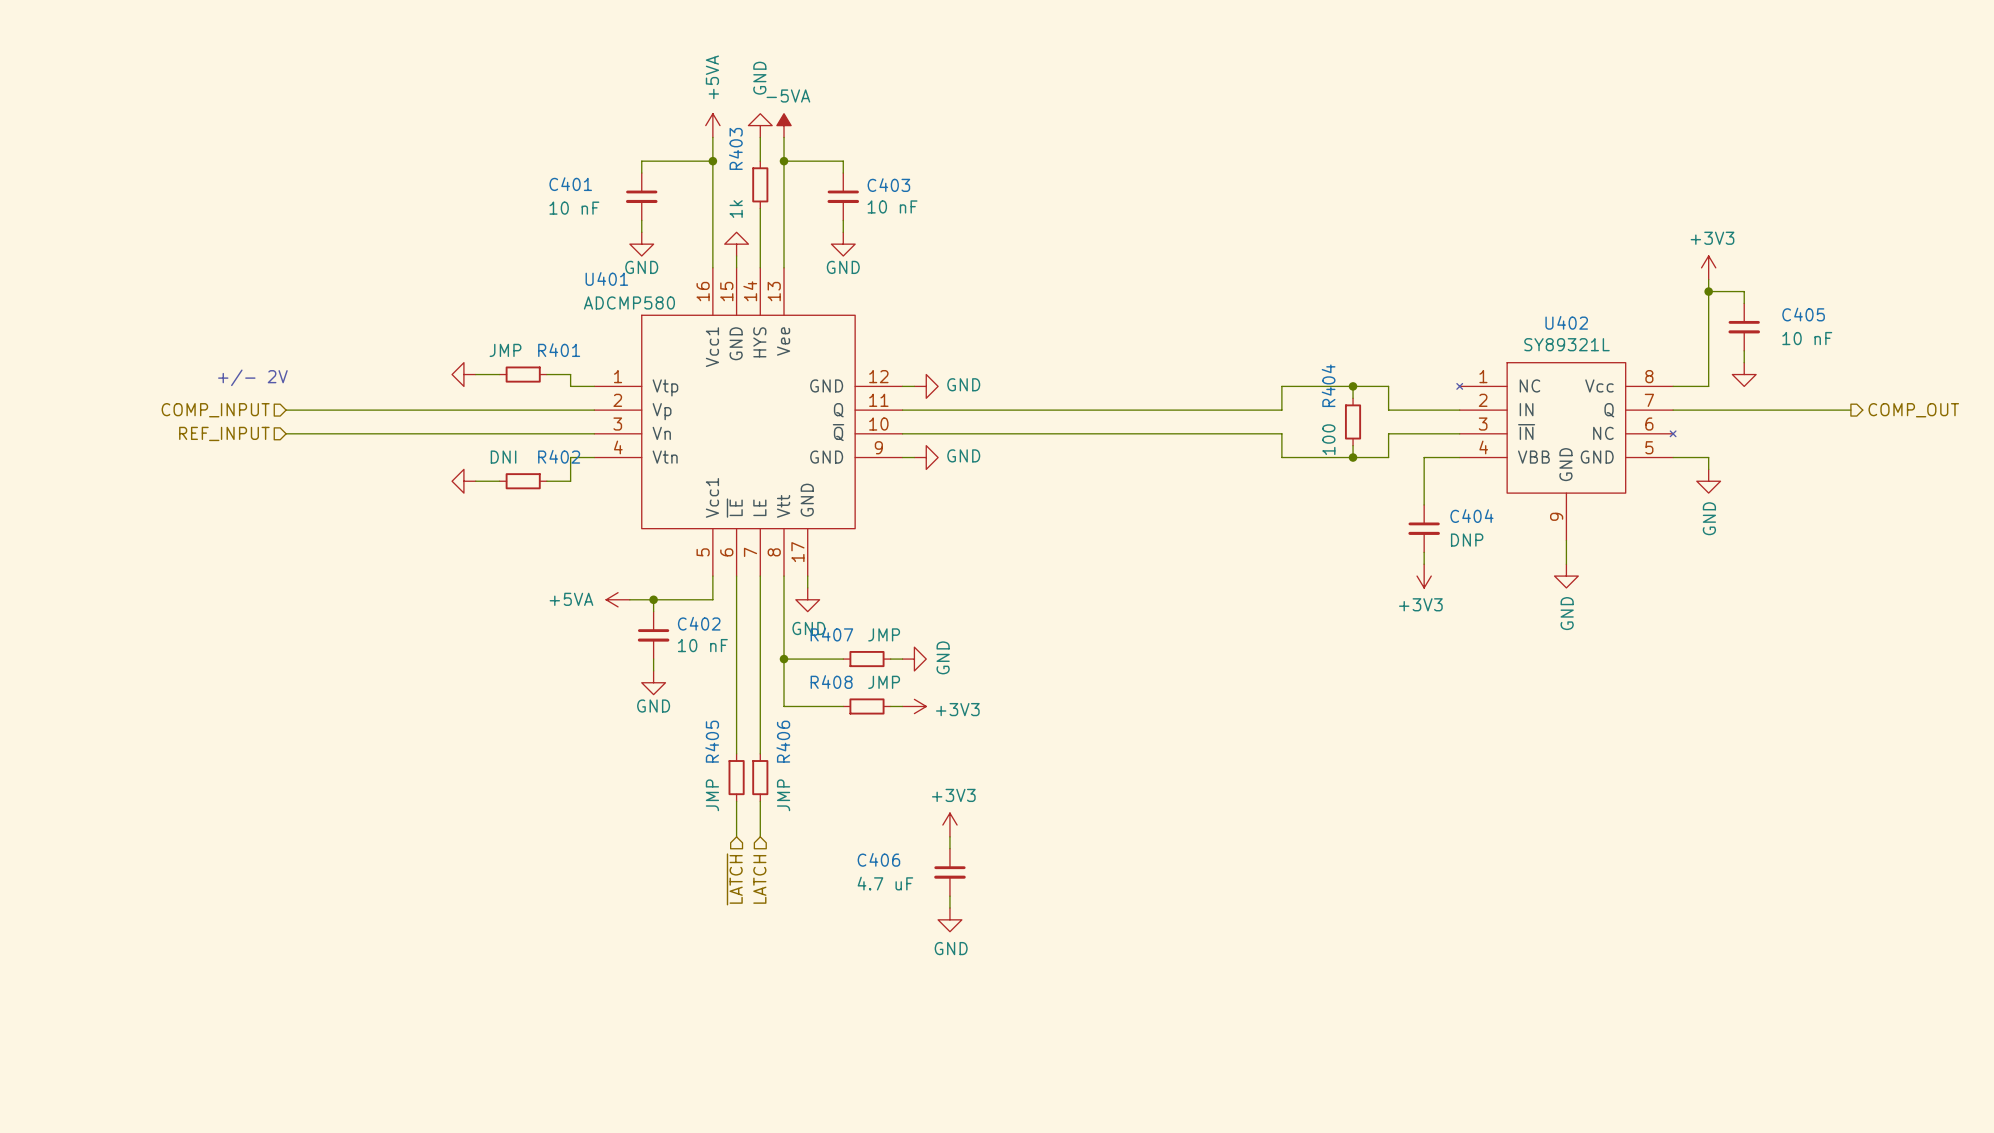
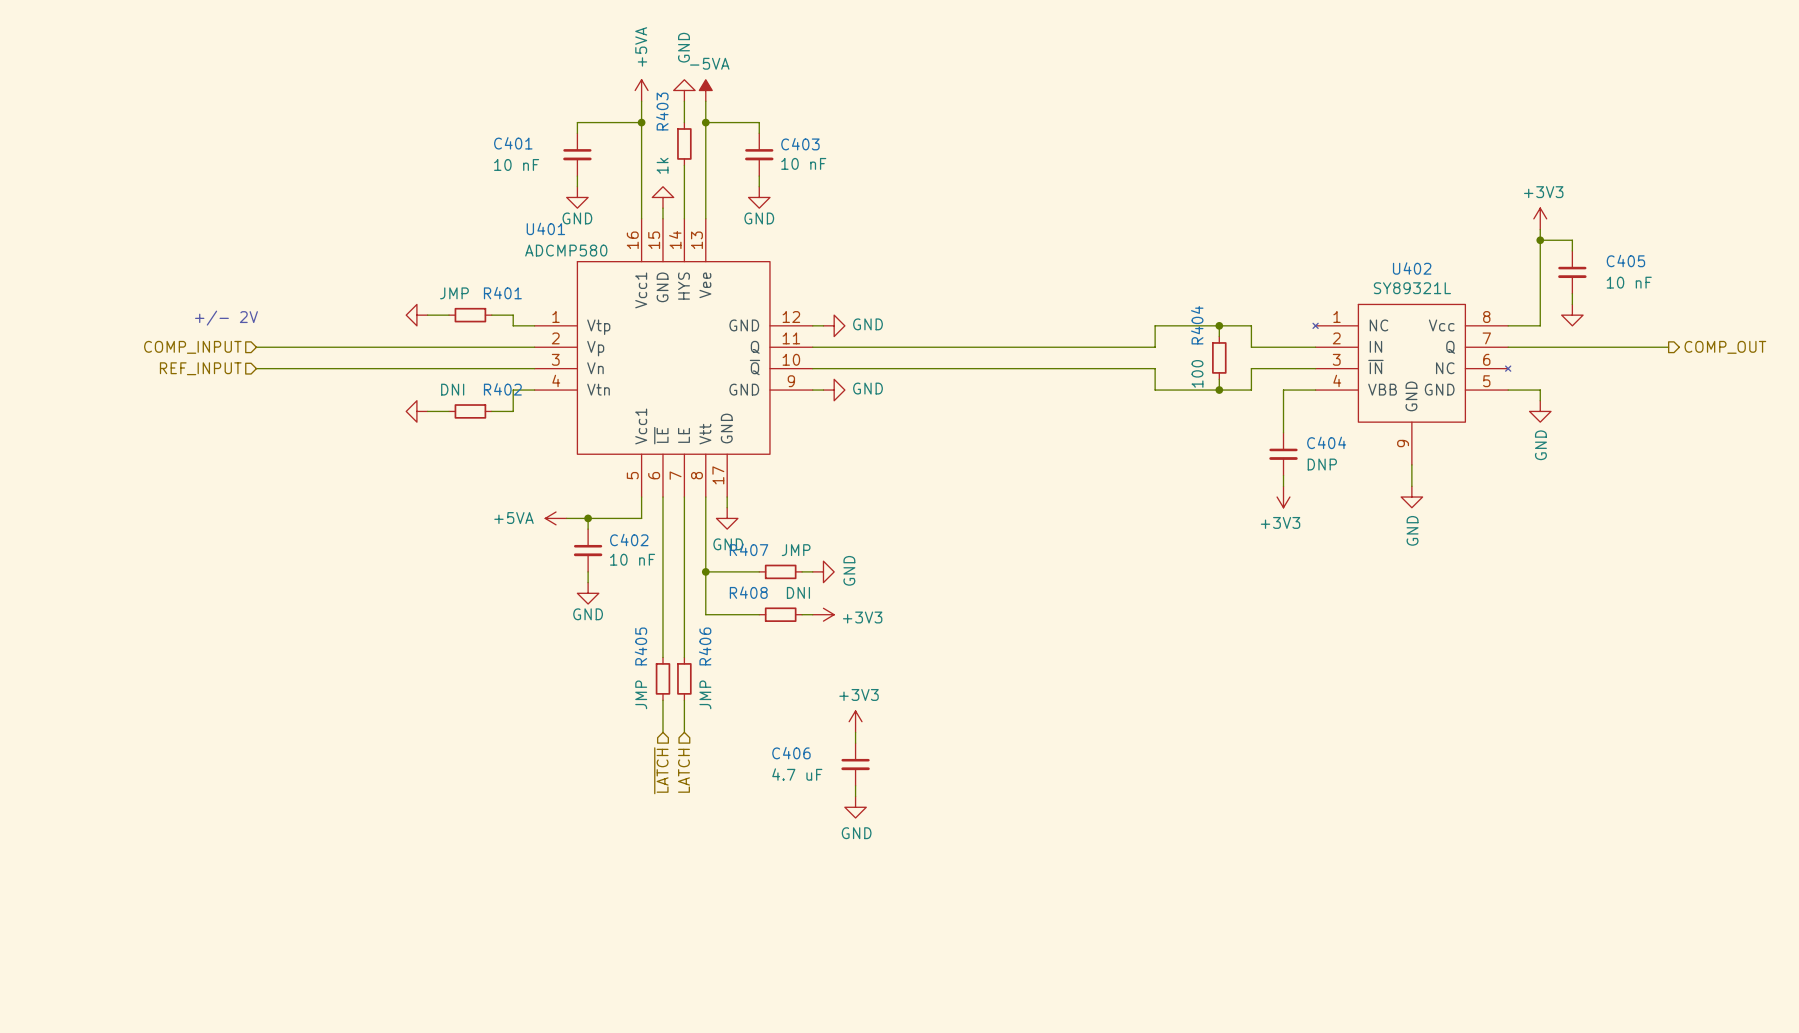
R408 value: JMP (884, 682) -> DNI (798, 592)

